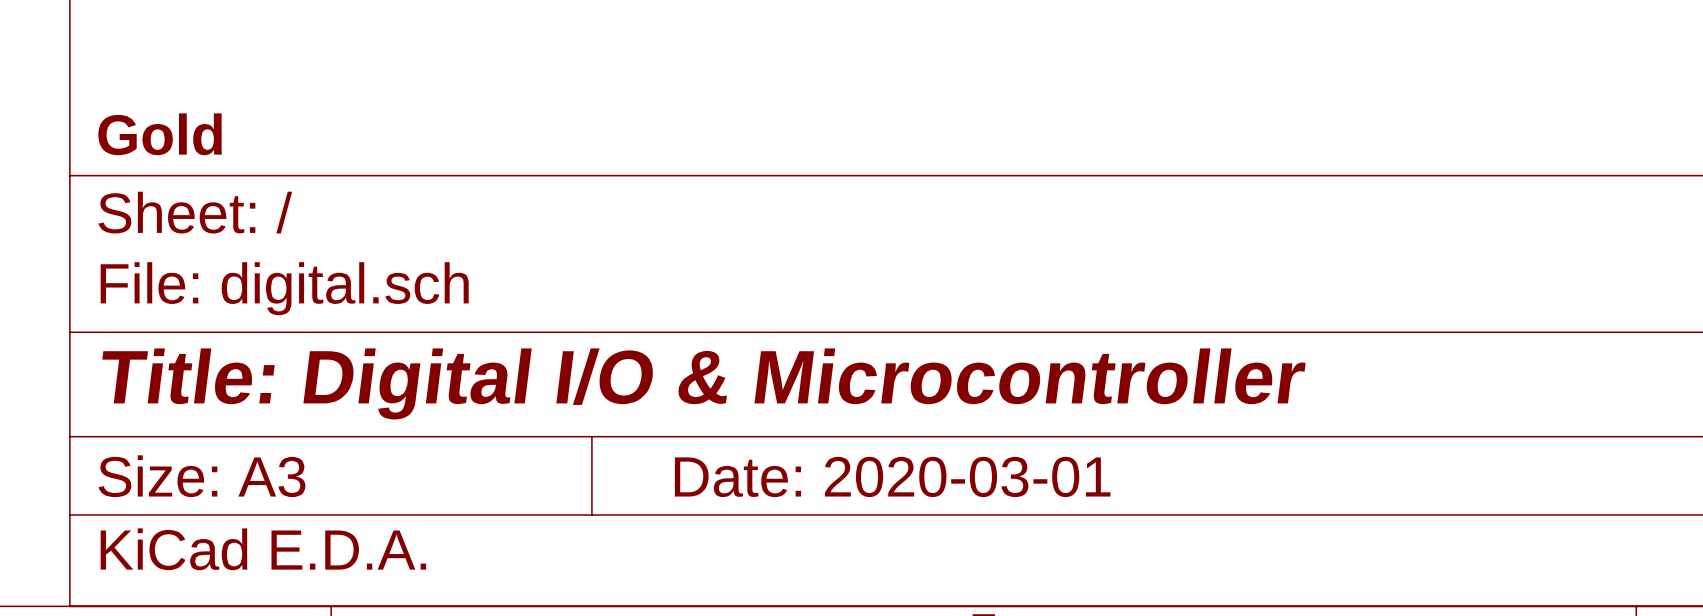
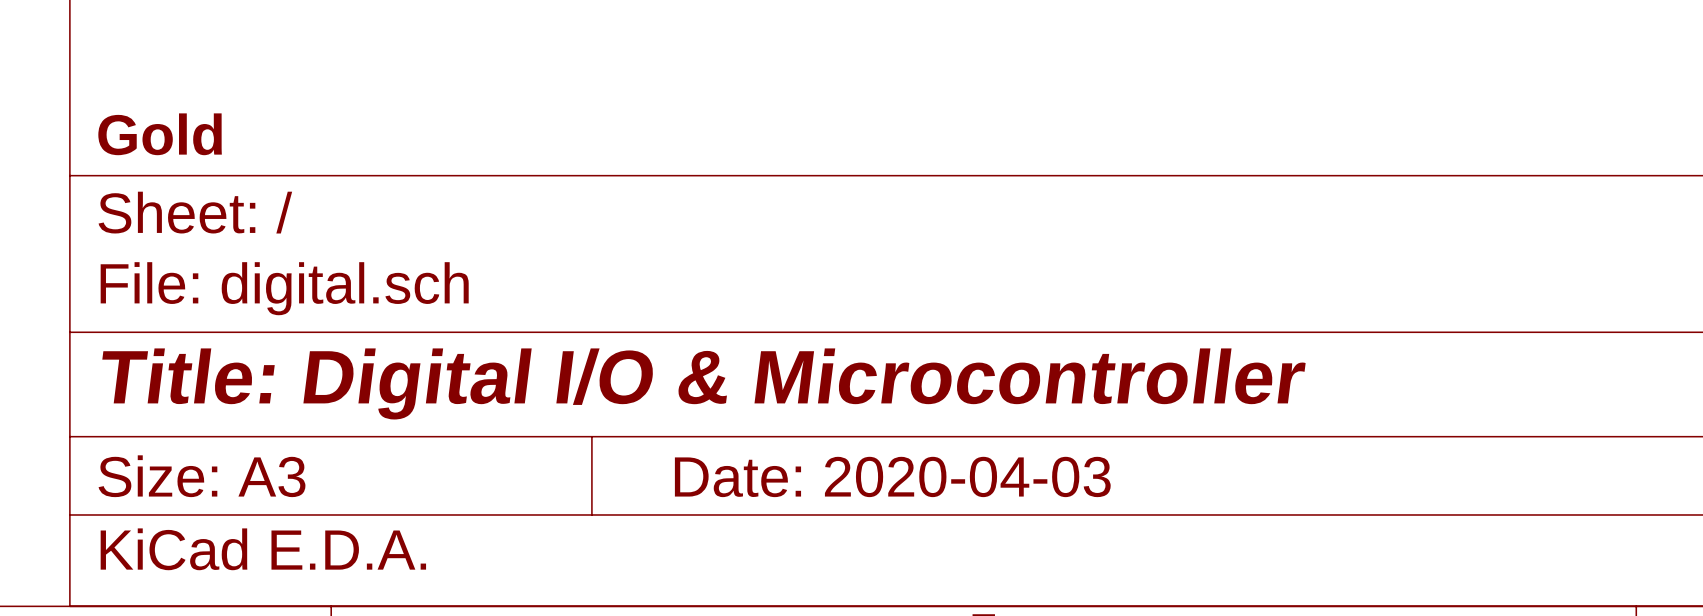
title block: Date: 2020-03-01 (892, 476) -> Date: 2020-04-03 (892, 476)

